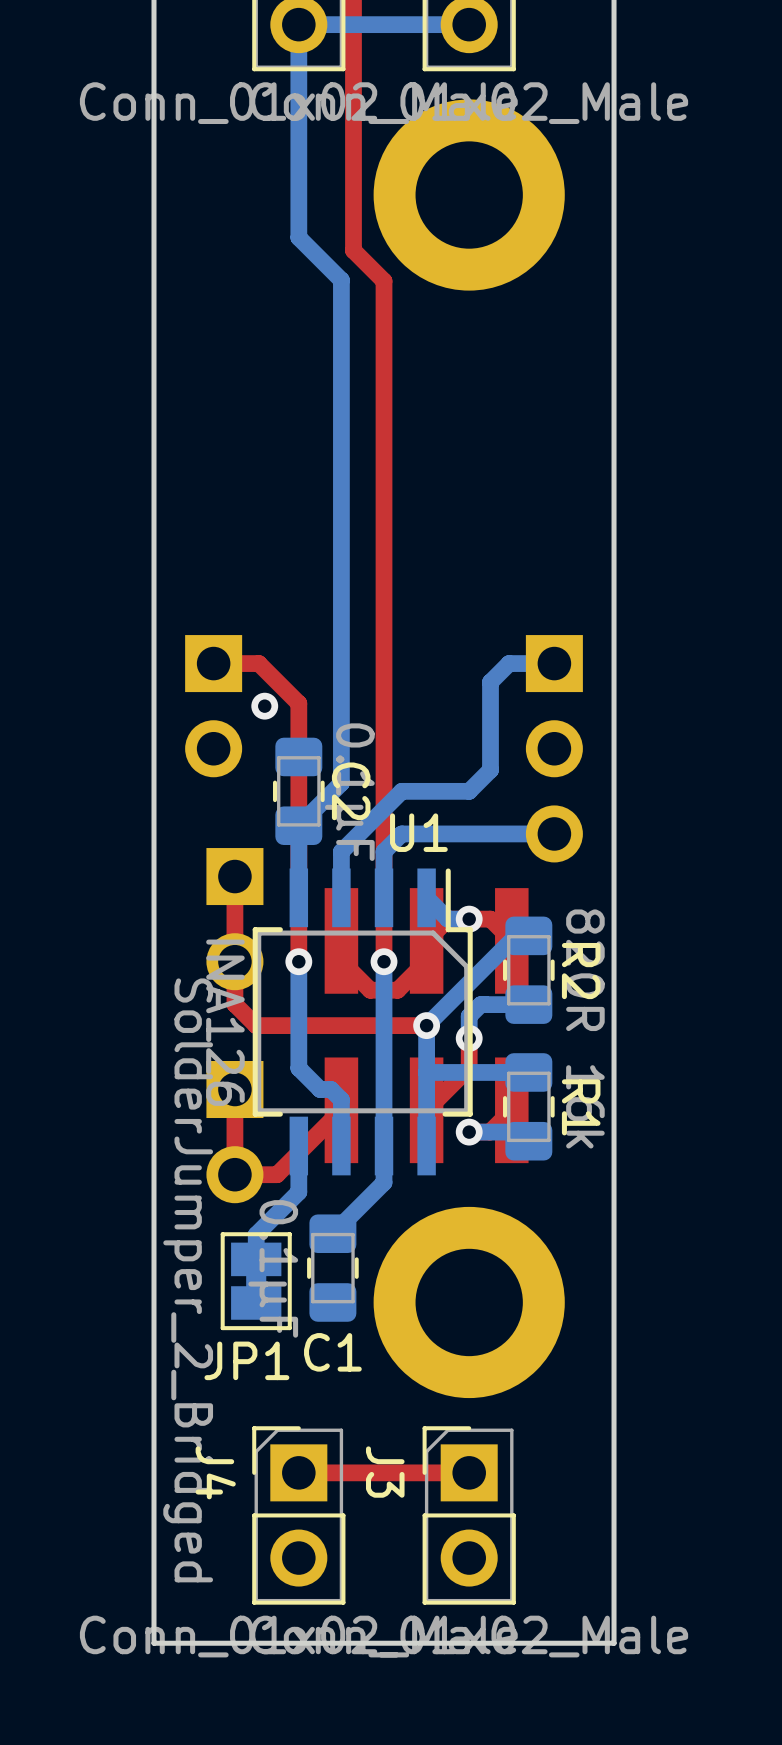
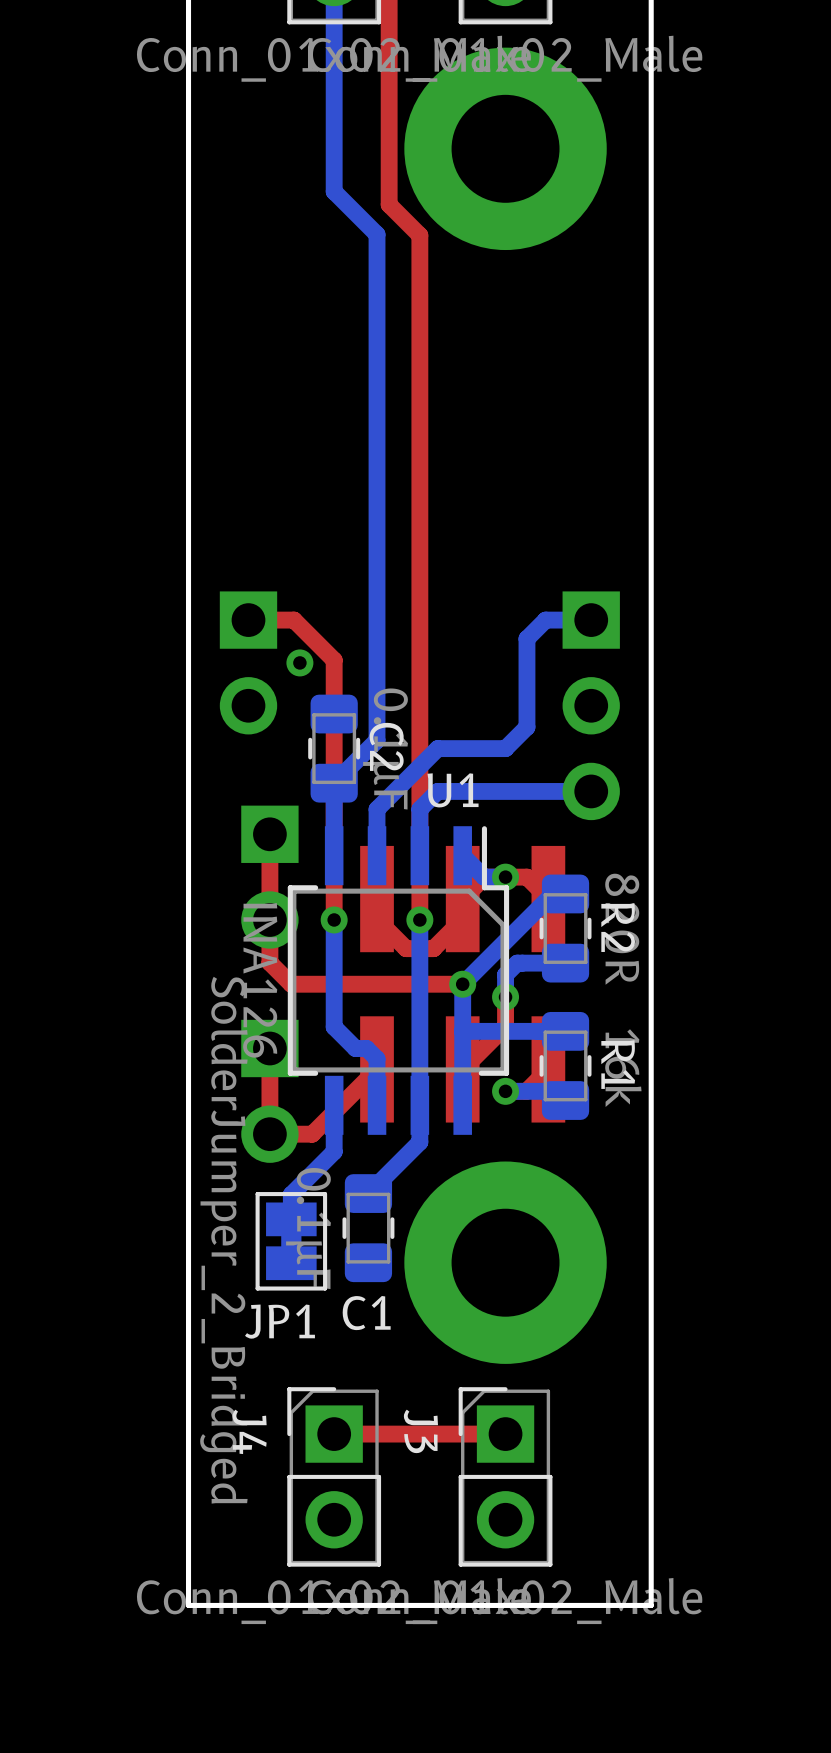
part: (469, 195) -> none
via: none -> (505, 148)
part: (469, 1302) -> none
via: none -> (505, 1262)

